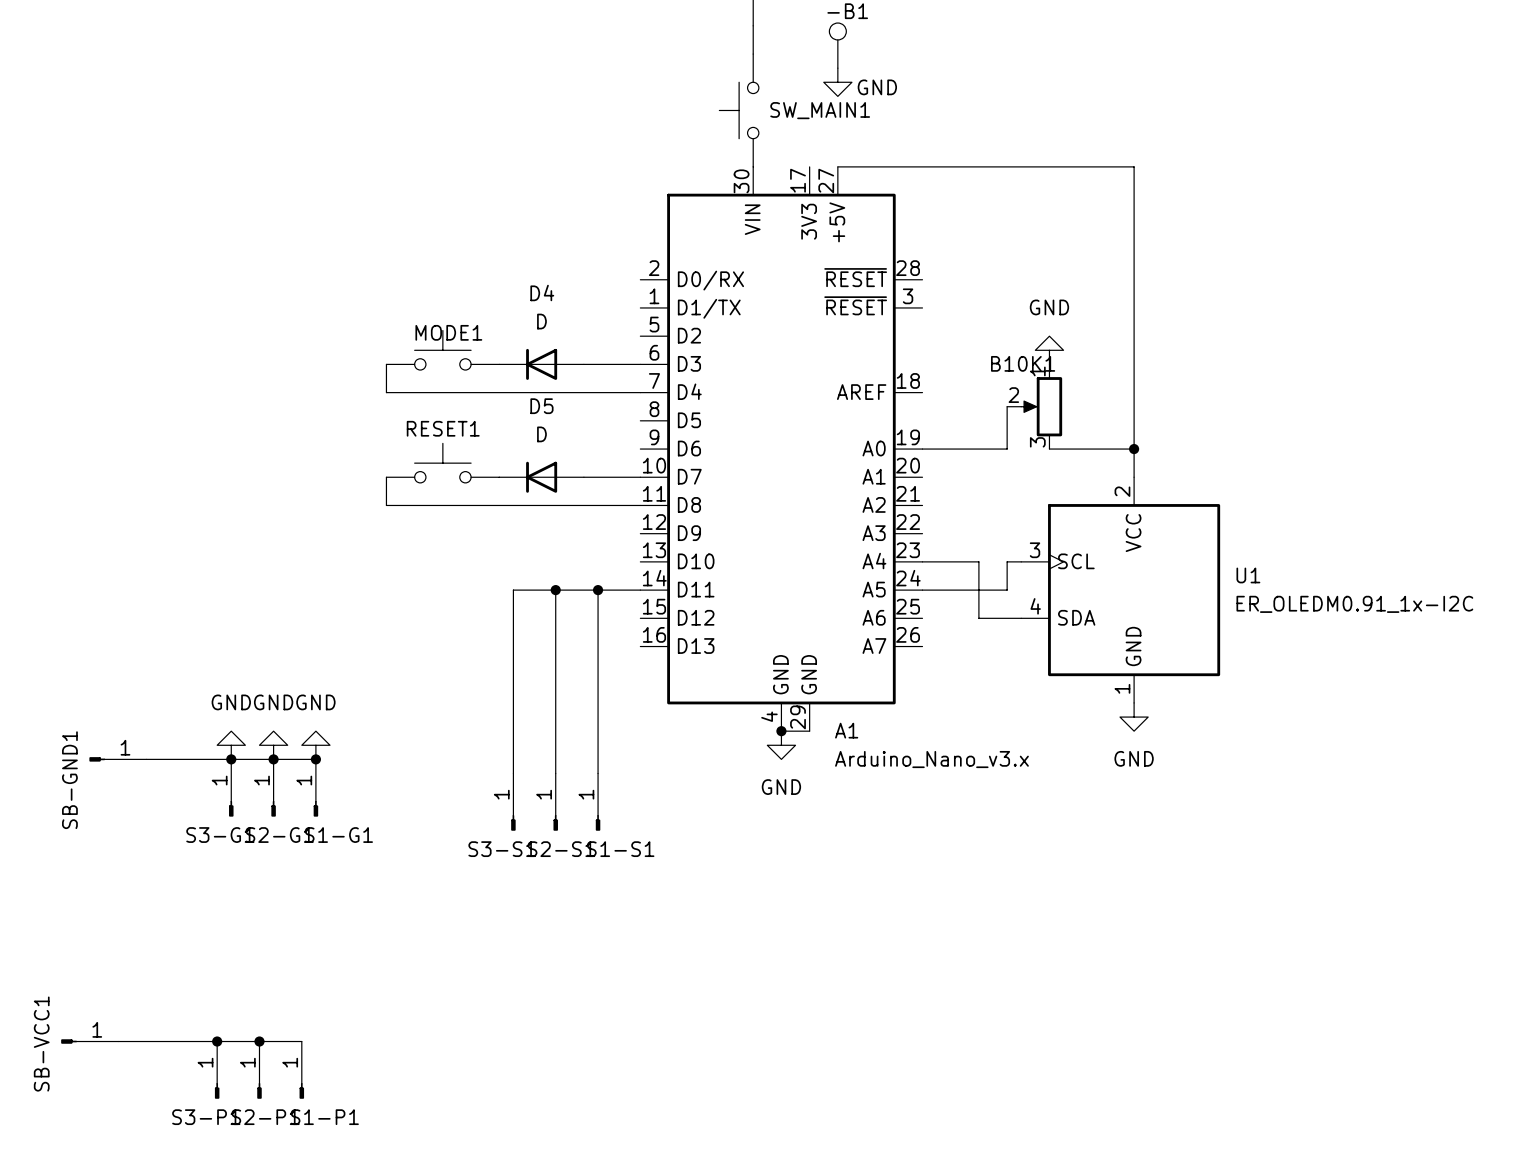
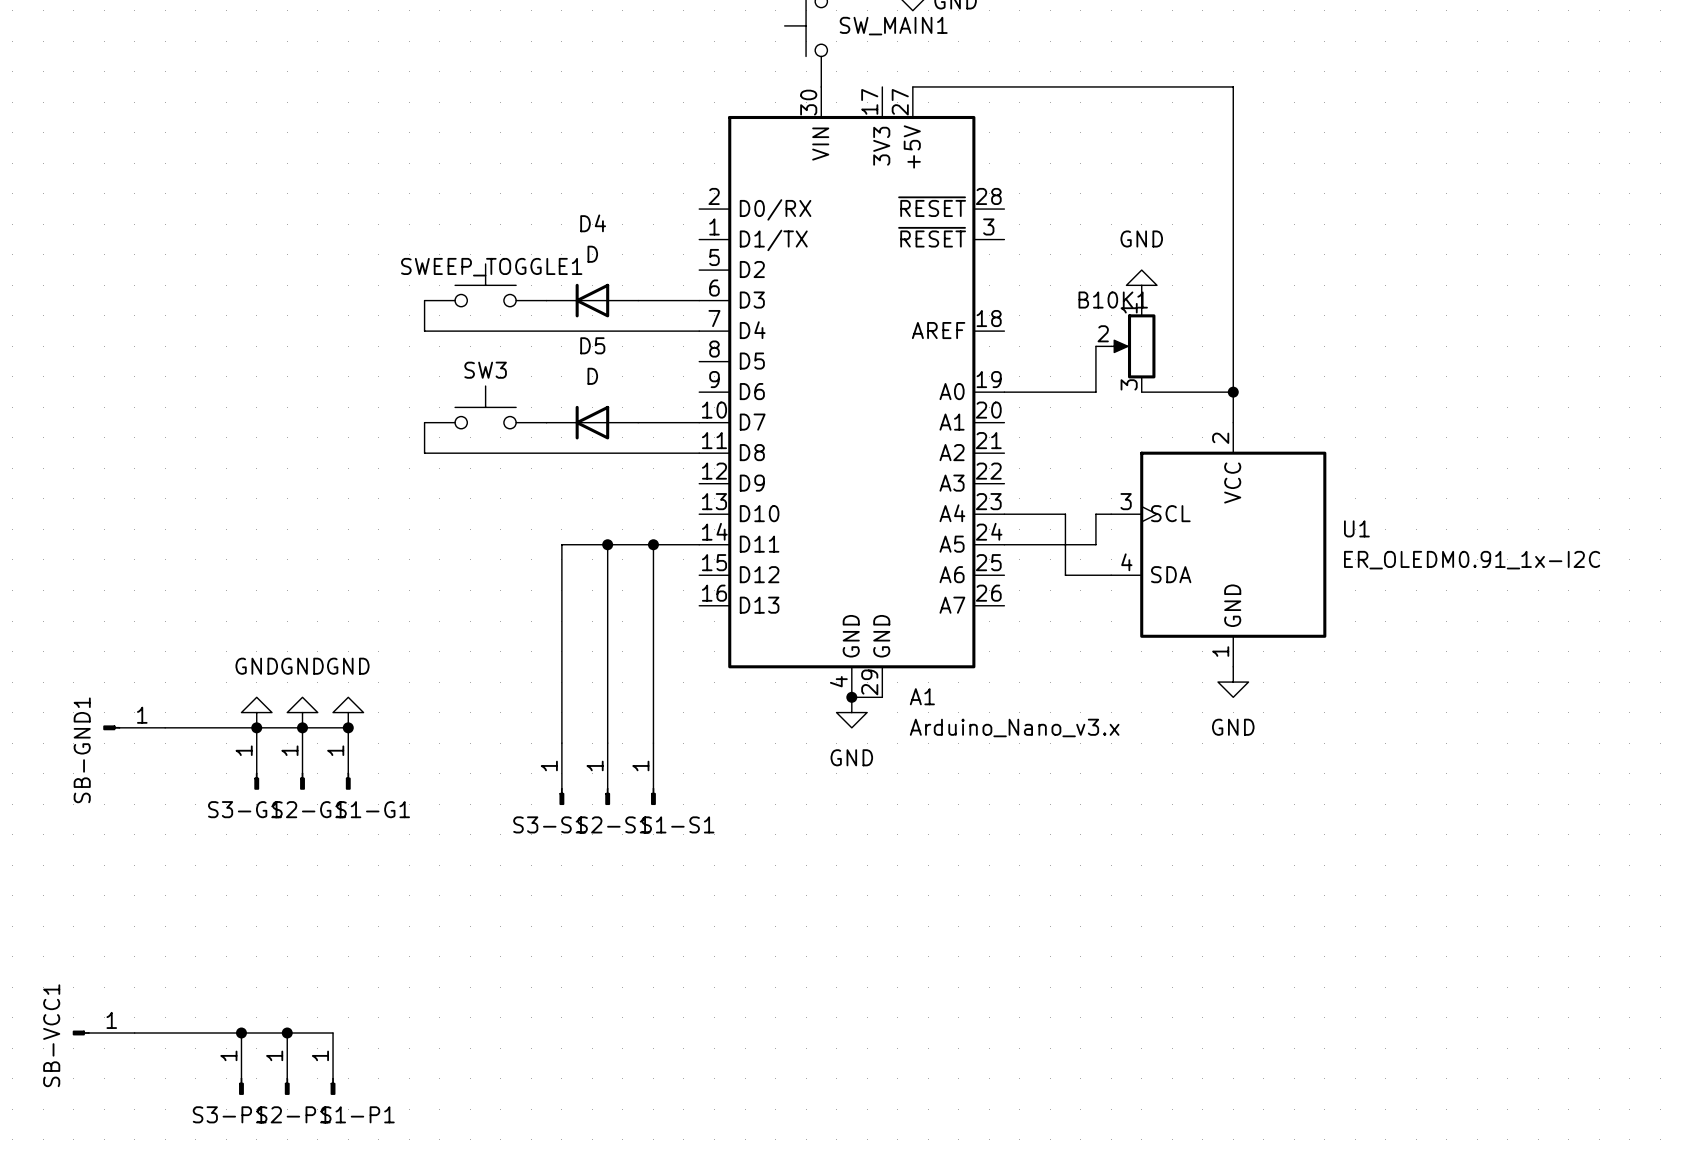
MODE1 name: MODE1 (448, 332) -> SWEEP_TOGGLE1 (491, 267)
RESET1 name: RESET1 (443, 428) -> SW3 (485, 370)

